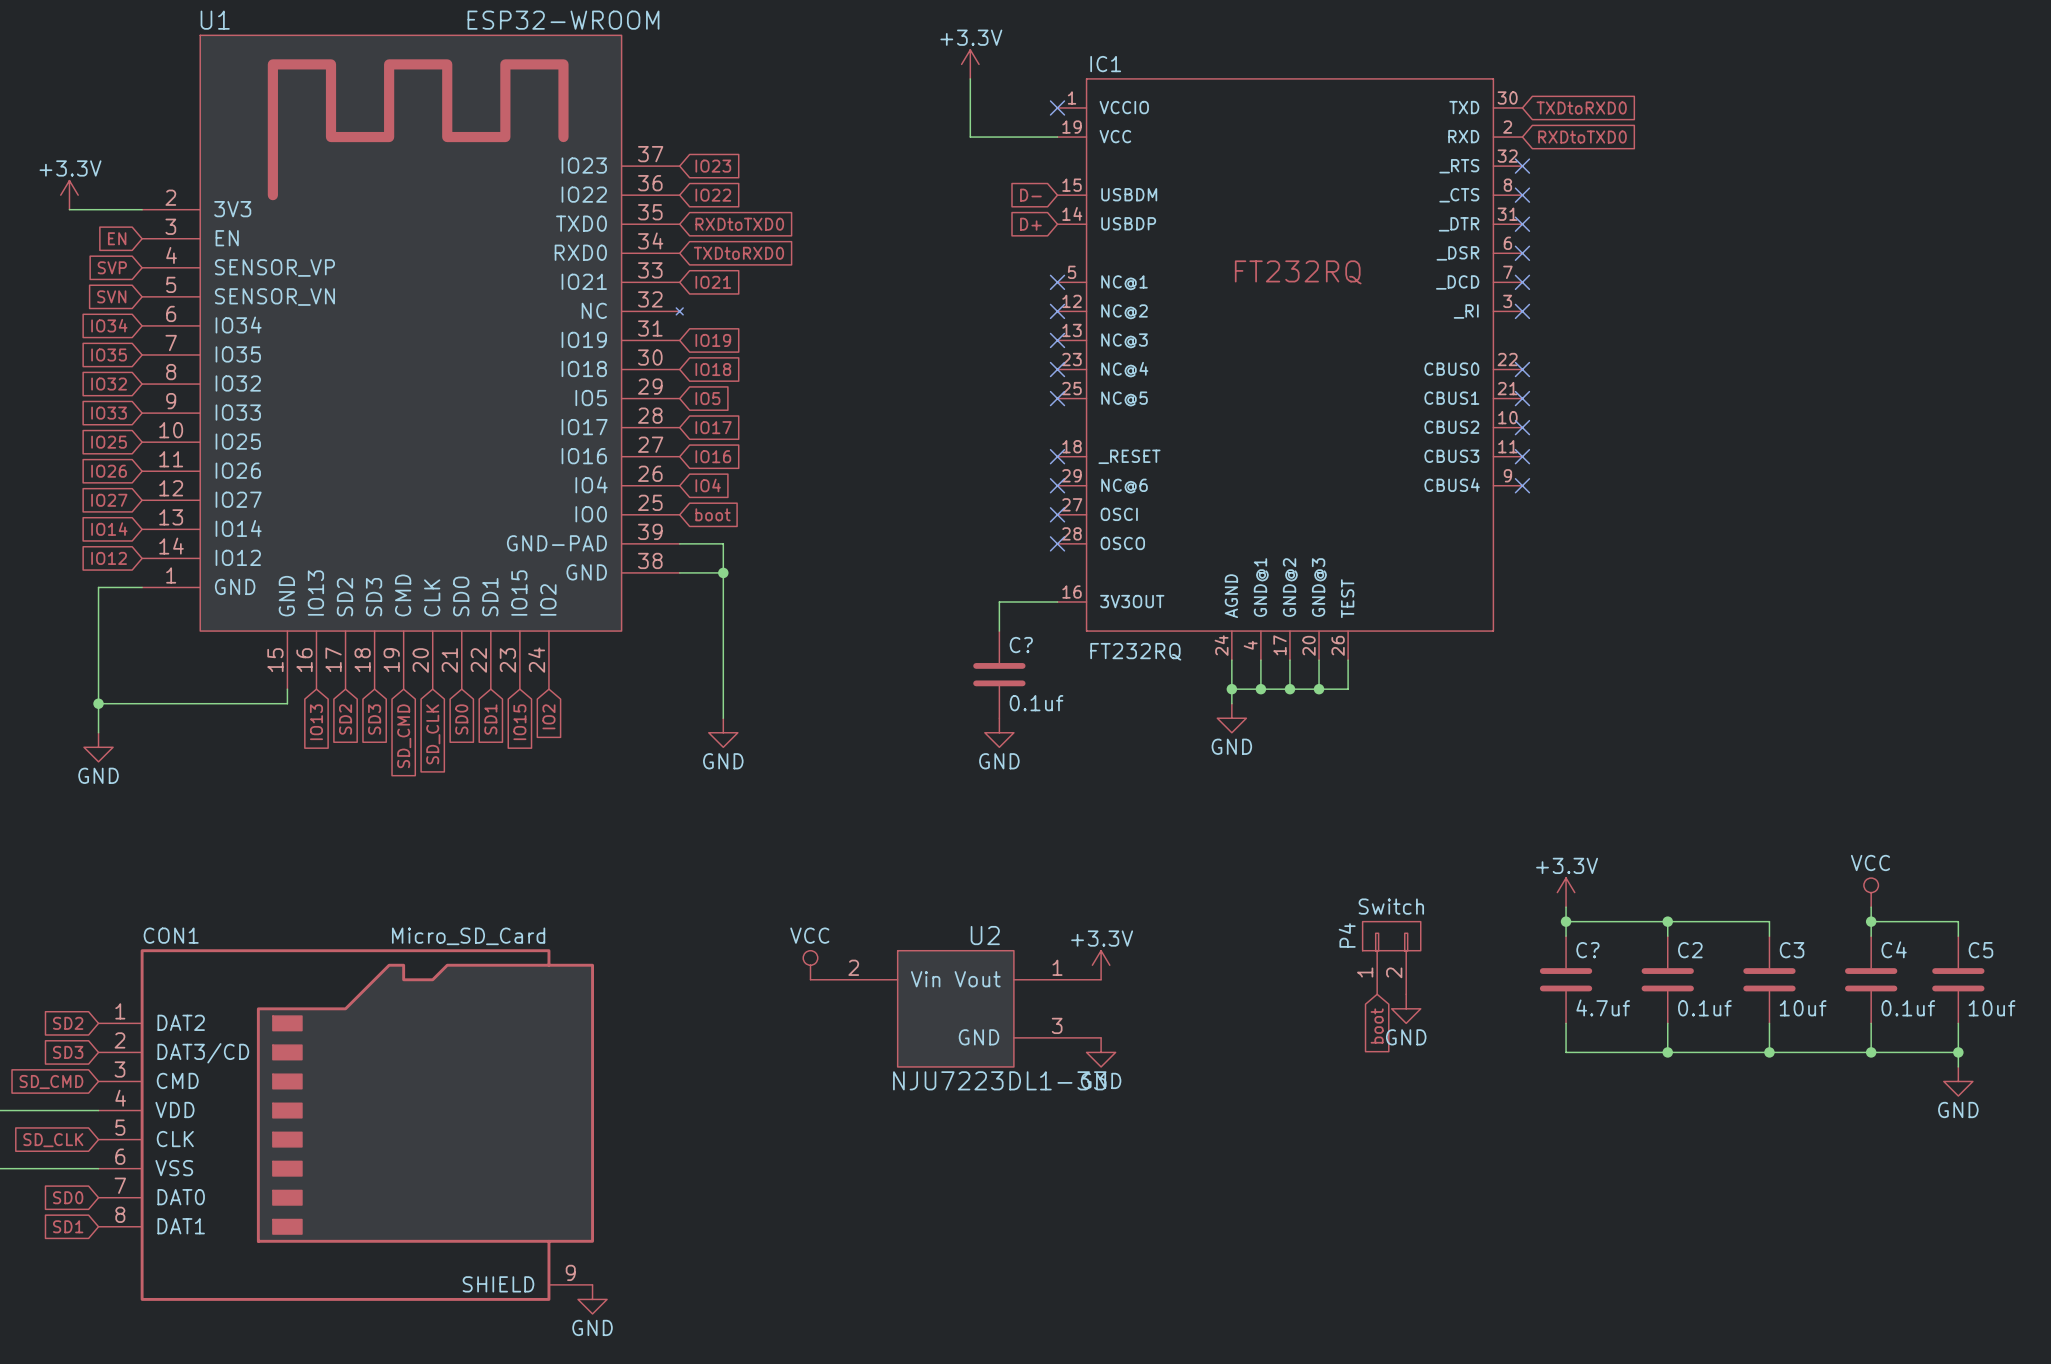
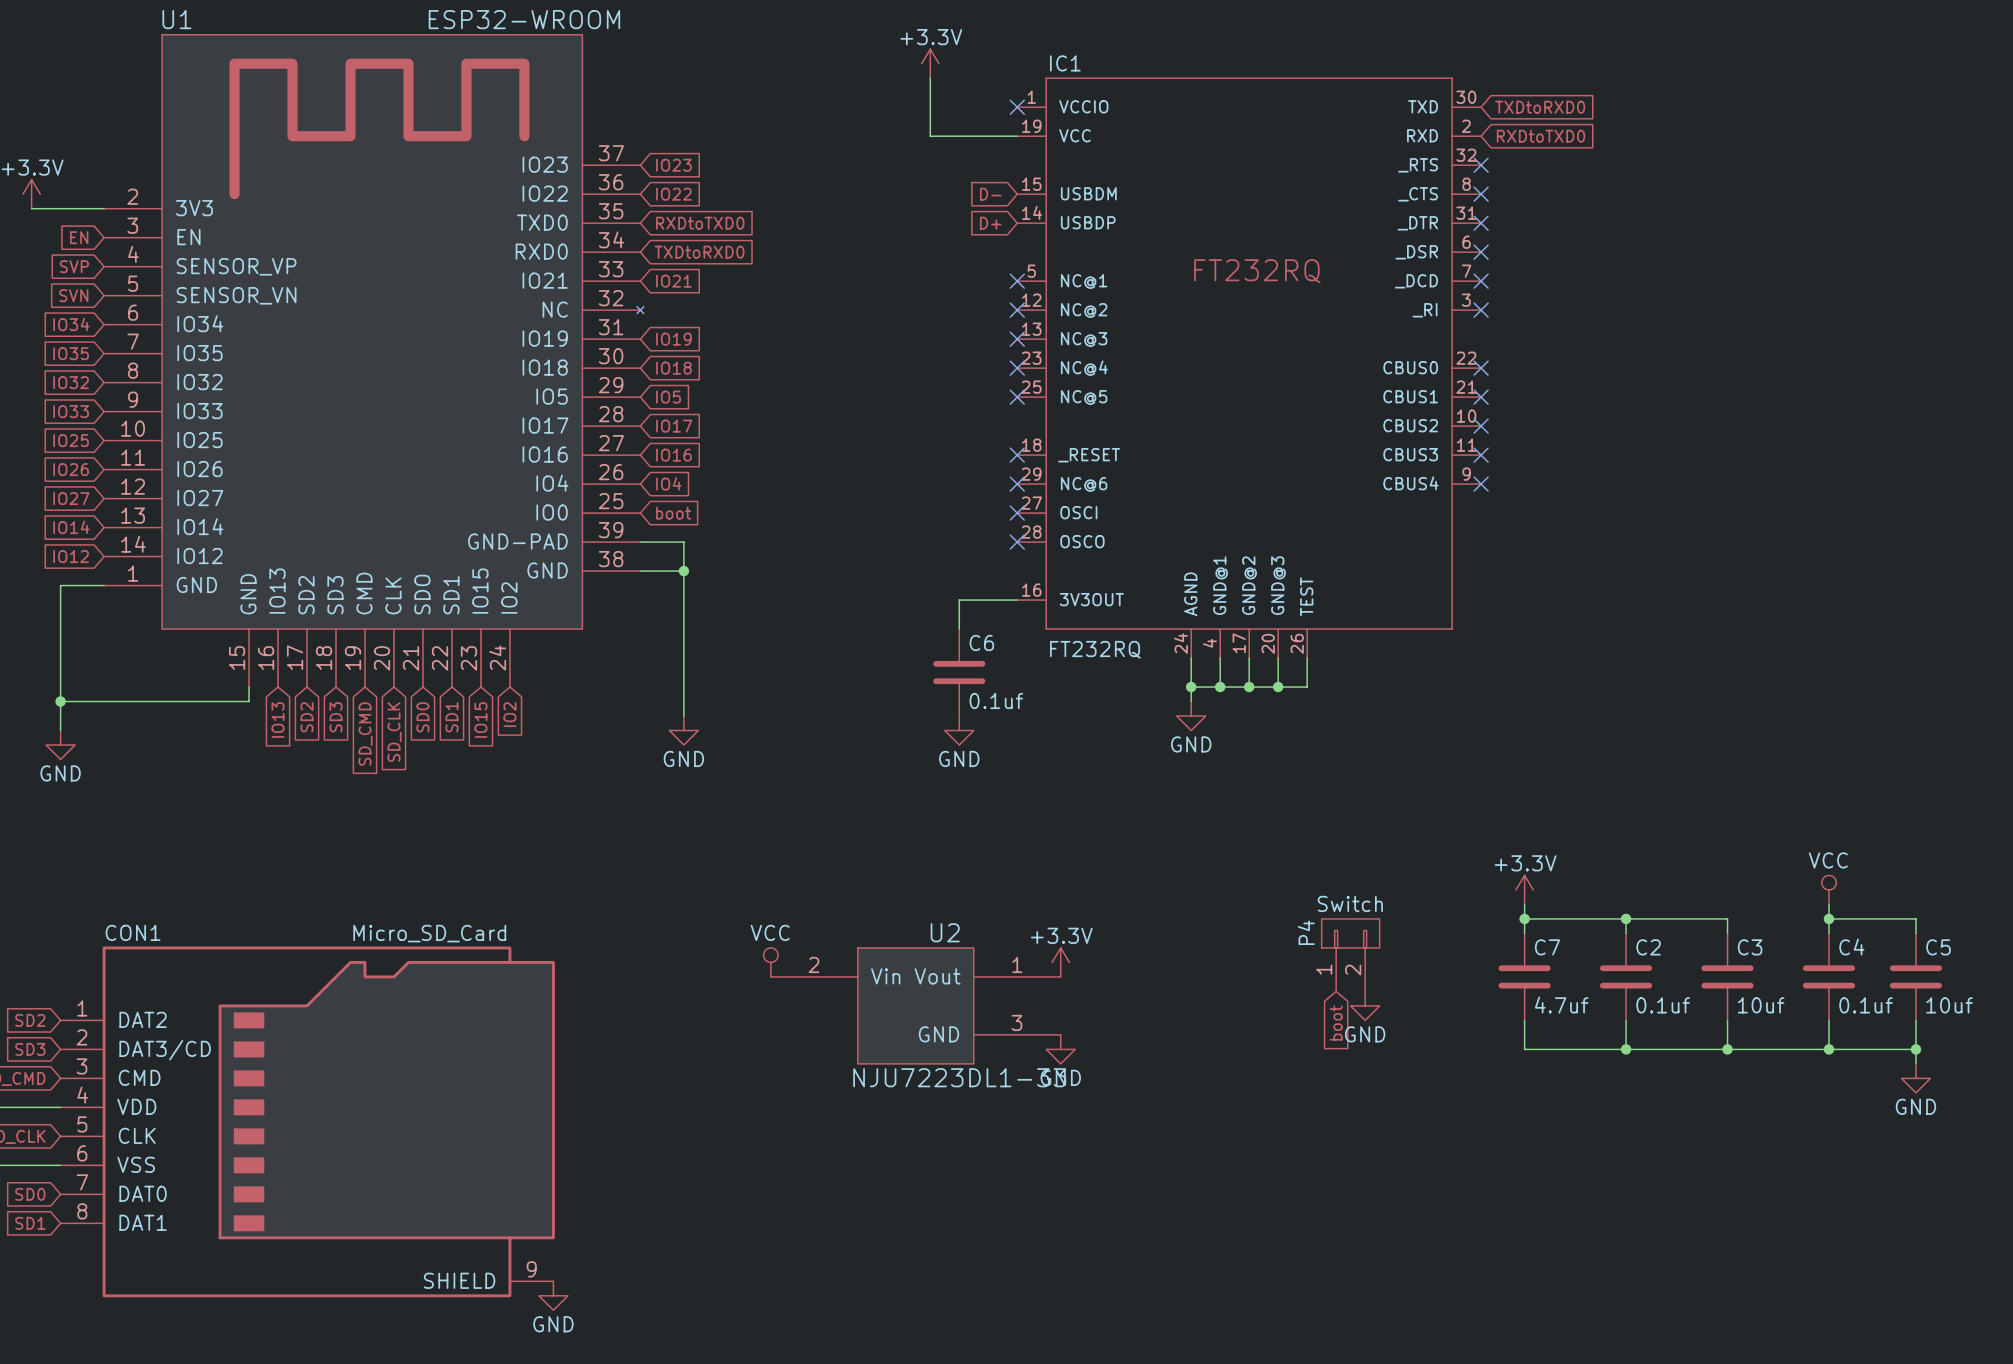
C? name: C? (1021, 645) -> C6 (981, 642)
C? name: C? (1587, 950) -> C7 (1547, 947)

